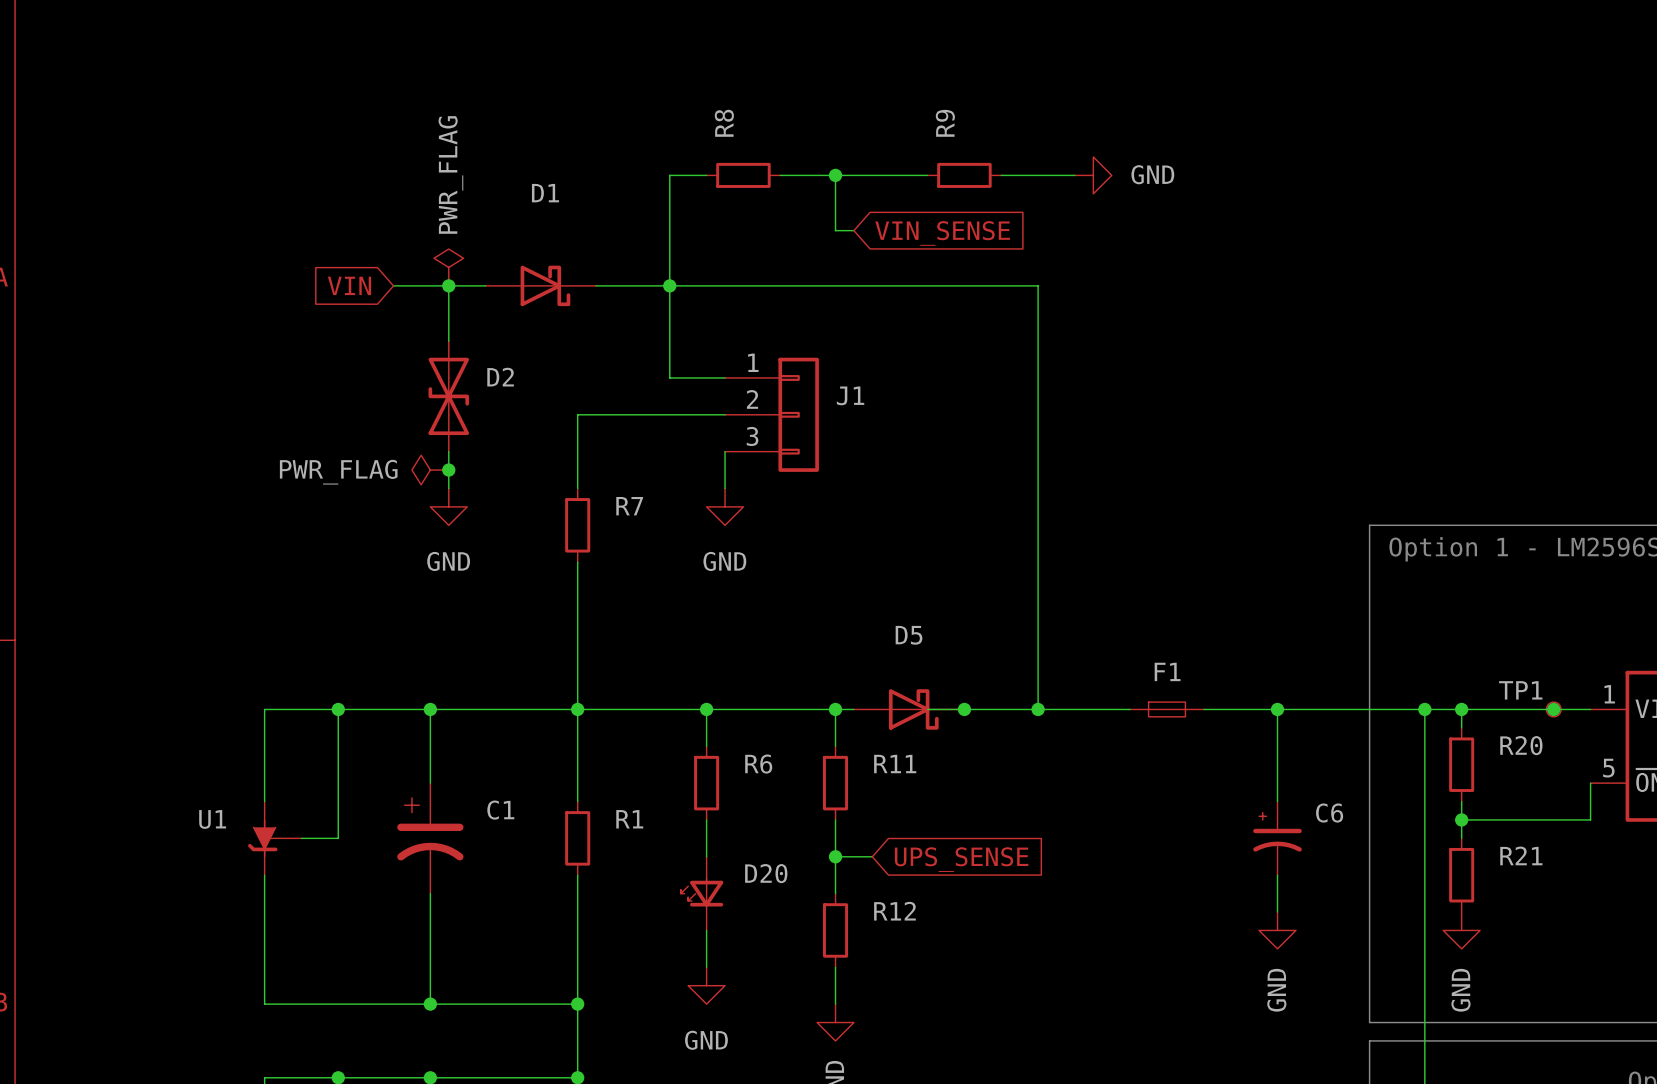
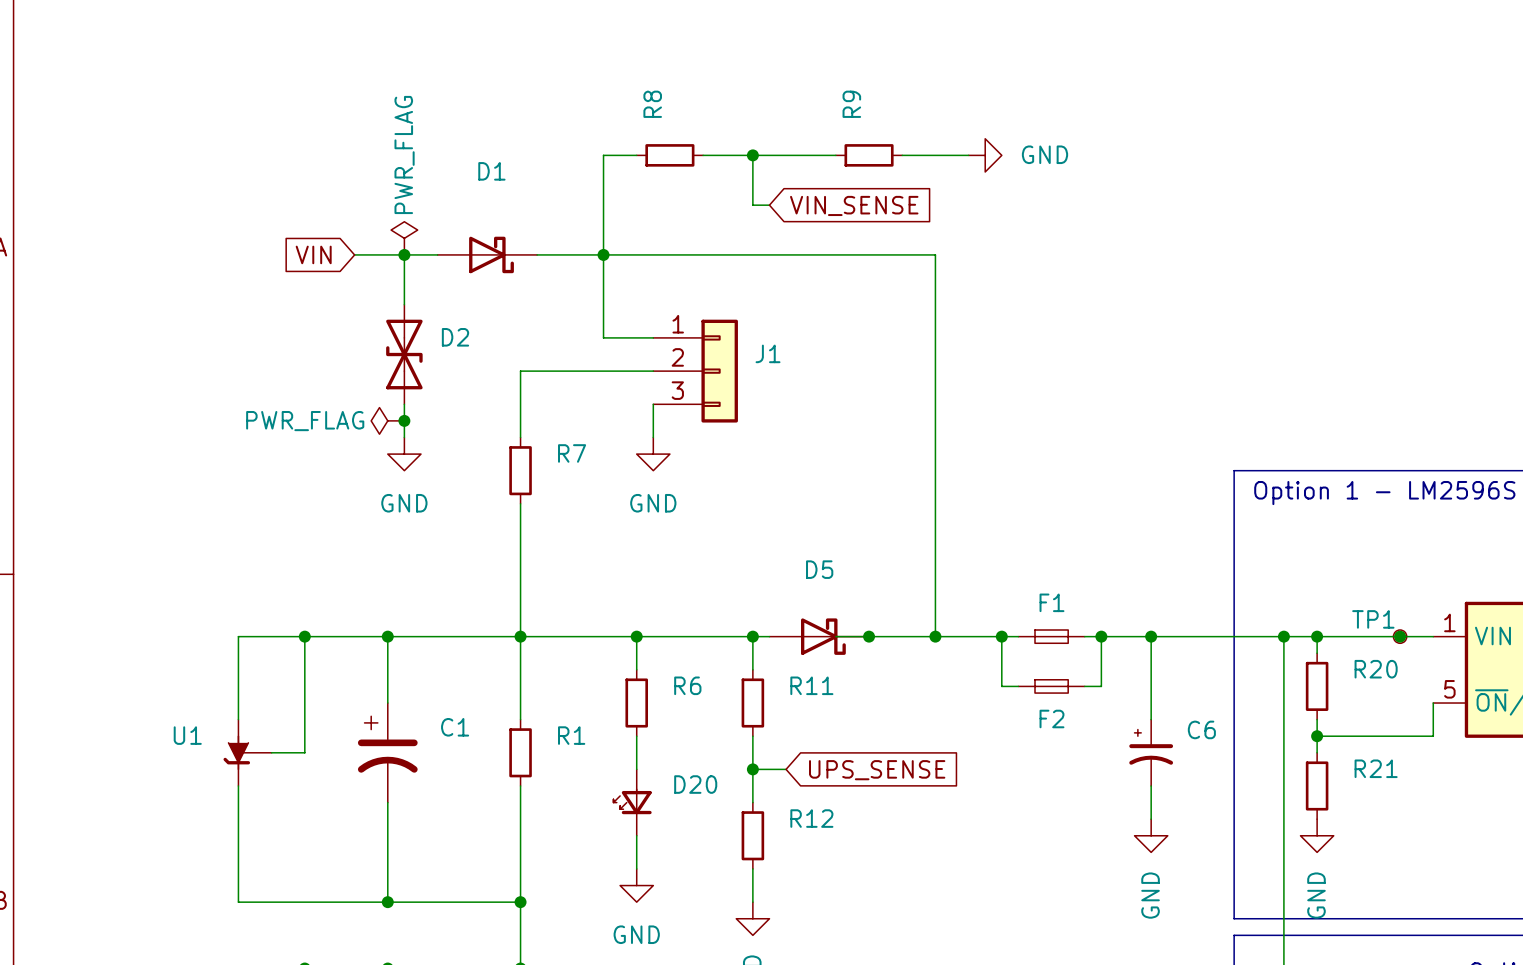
wire: none -> (1001, 636) (1001, 686) (1018, 686)
junction: none -> (1001, 636)
wire: none -> (1101, 636) (1101, 686) (1084, 686)
junction: none -> (1101, 636)
F2: none -> (1051, 686)

